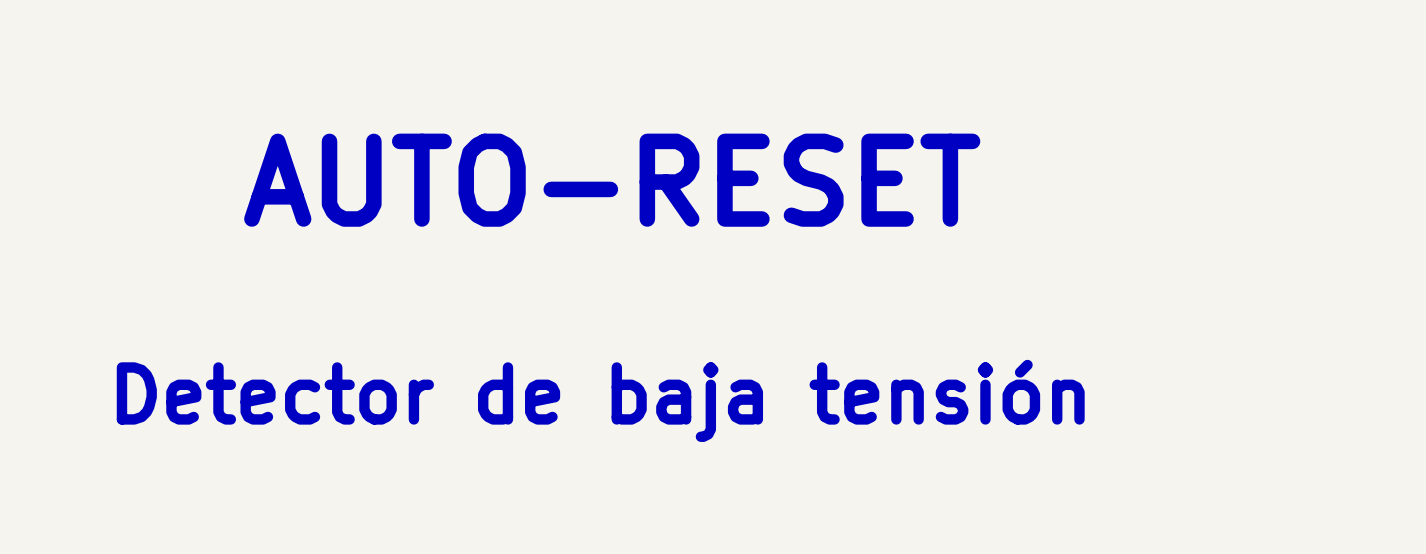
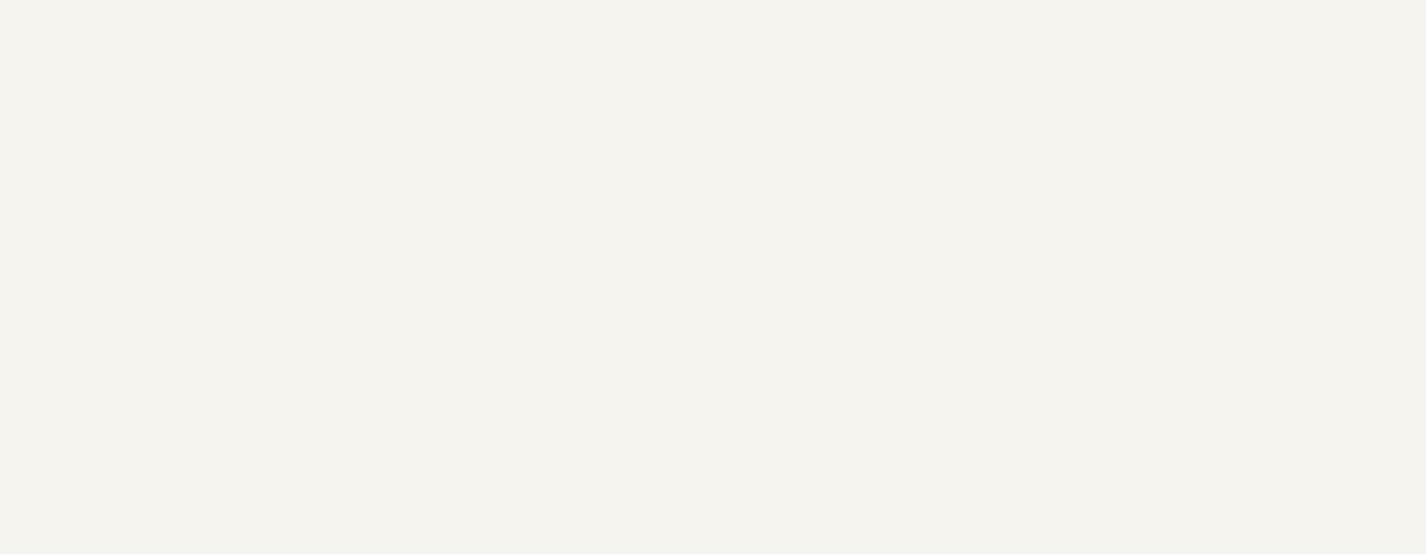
text: AUTO-RESET (612, 180) -> none
text: Detector de baja tensión (600, 400) -> none

